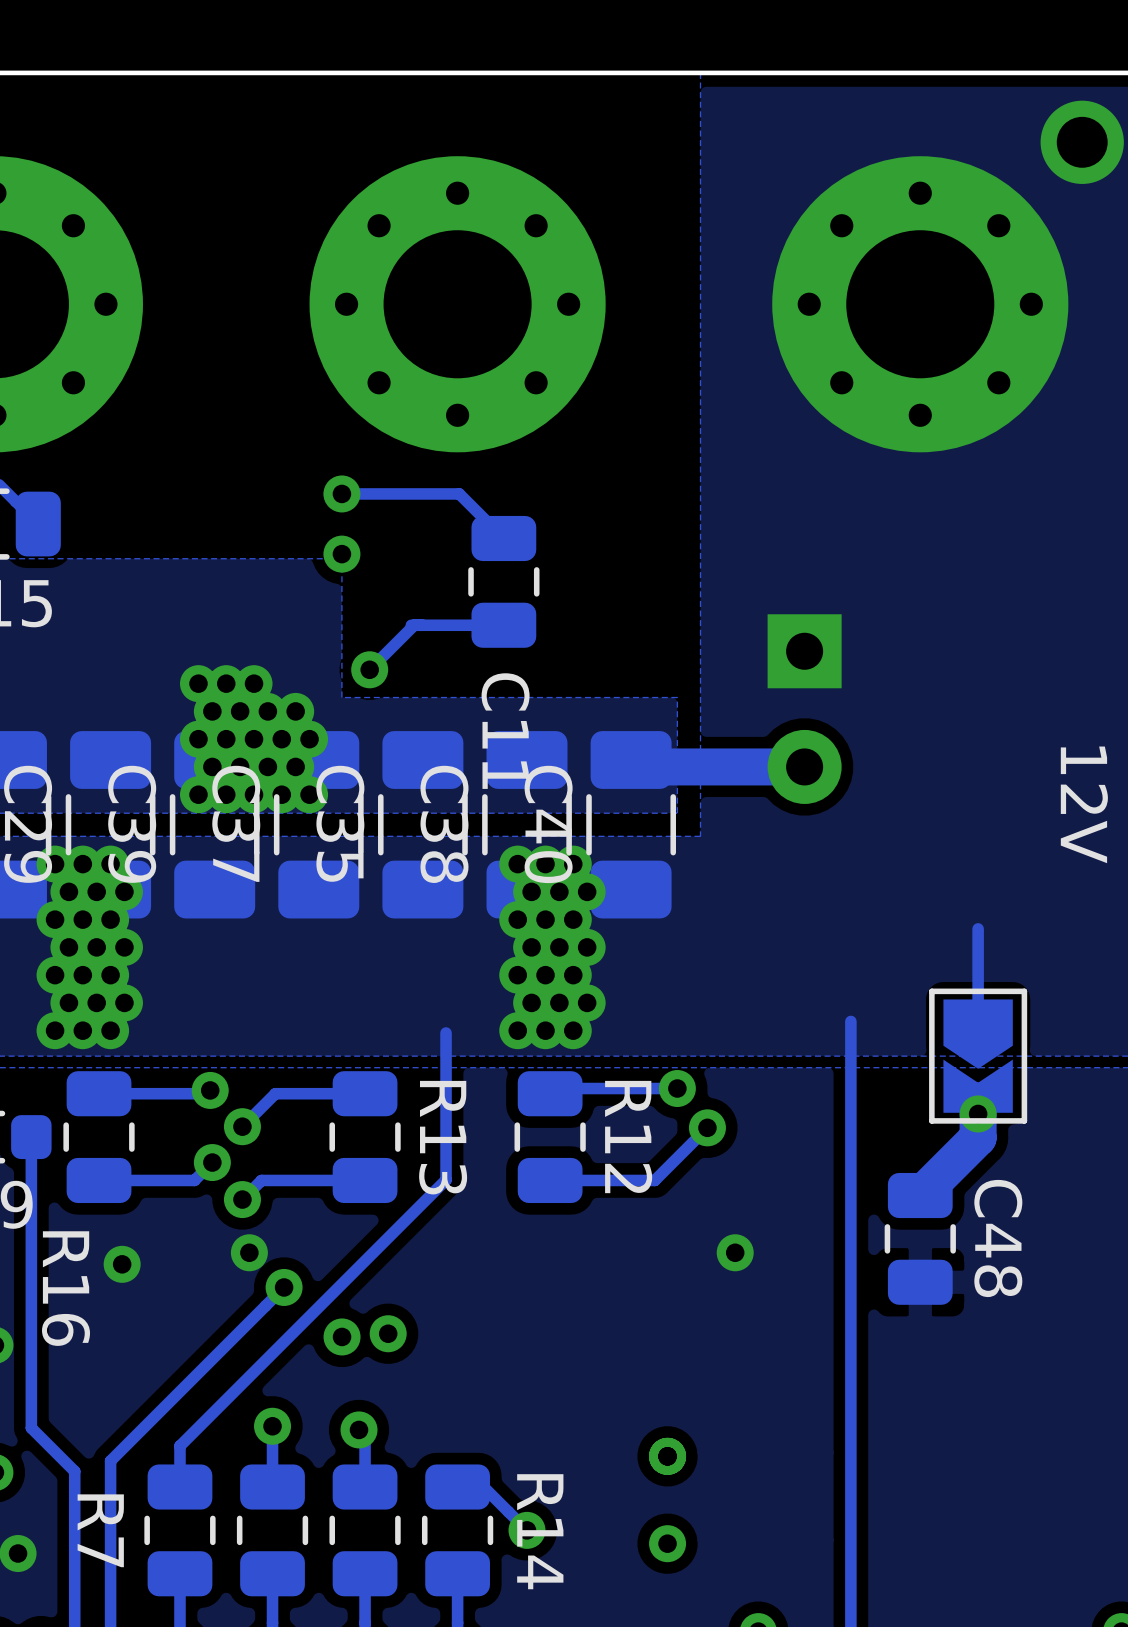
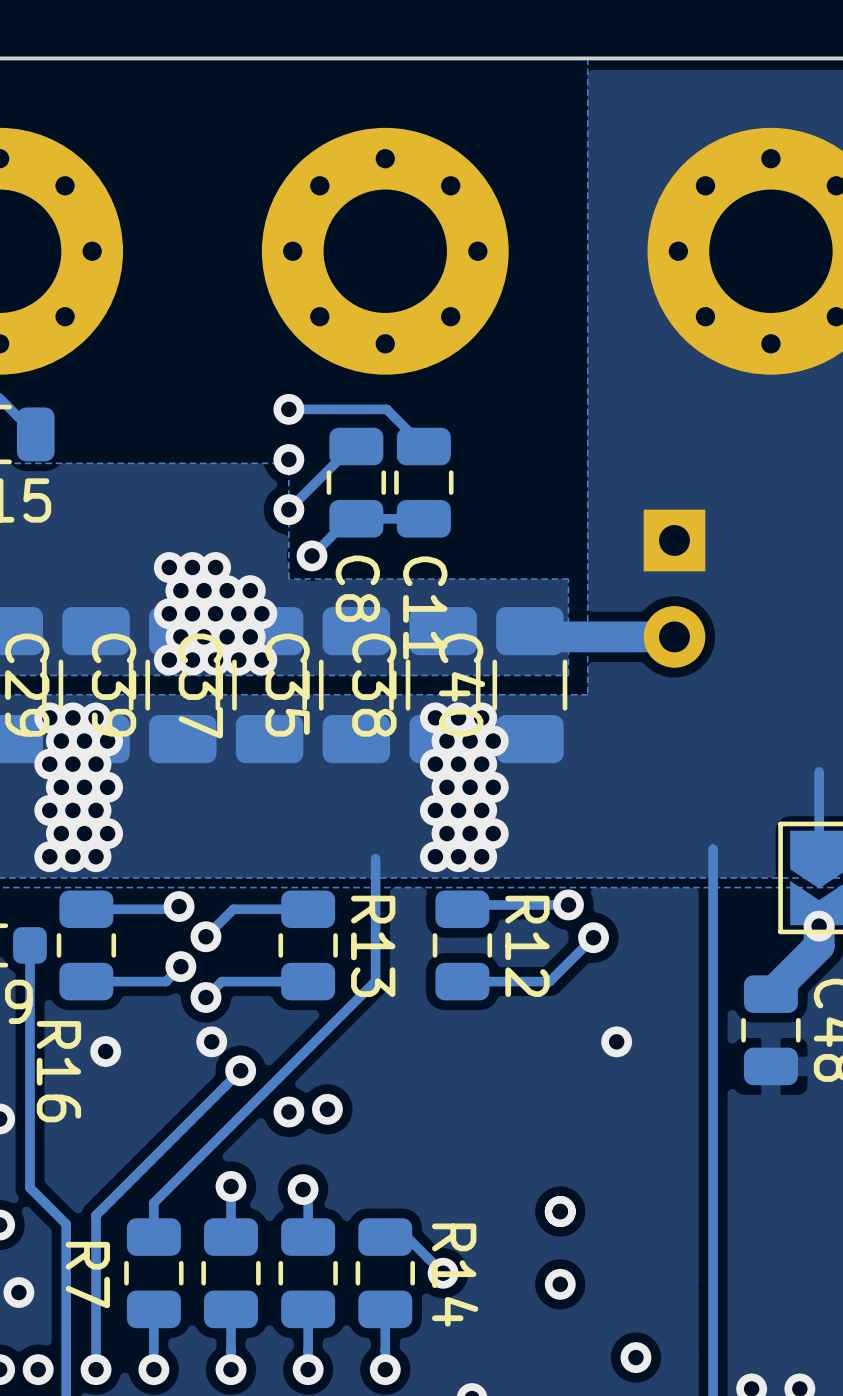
track: none -> (346, 446) (346, 451) (288, 509)
C8: none -> (356, 482)
via: none -> (288, 509)

